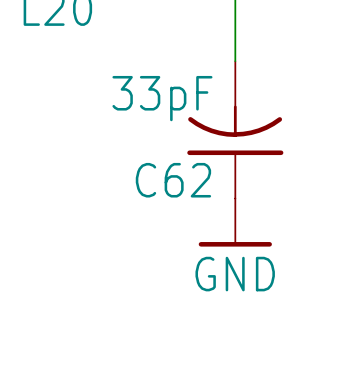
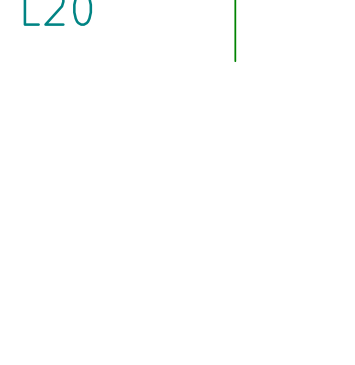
C62: 33pF (235, 129) -> none
power symbol: GND (235, 222) -> none

